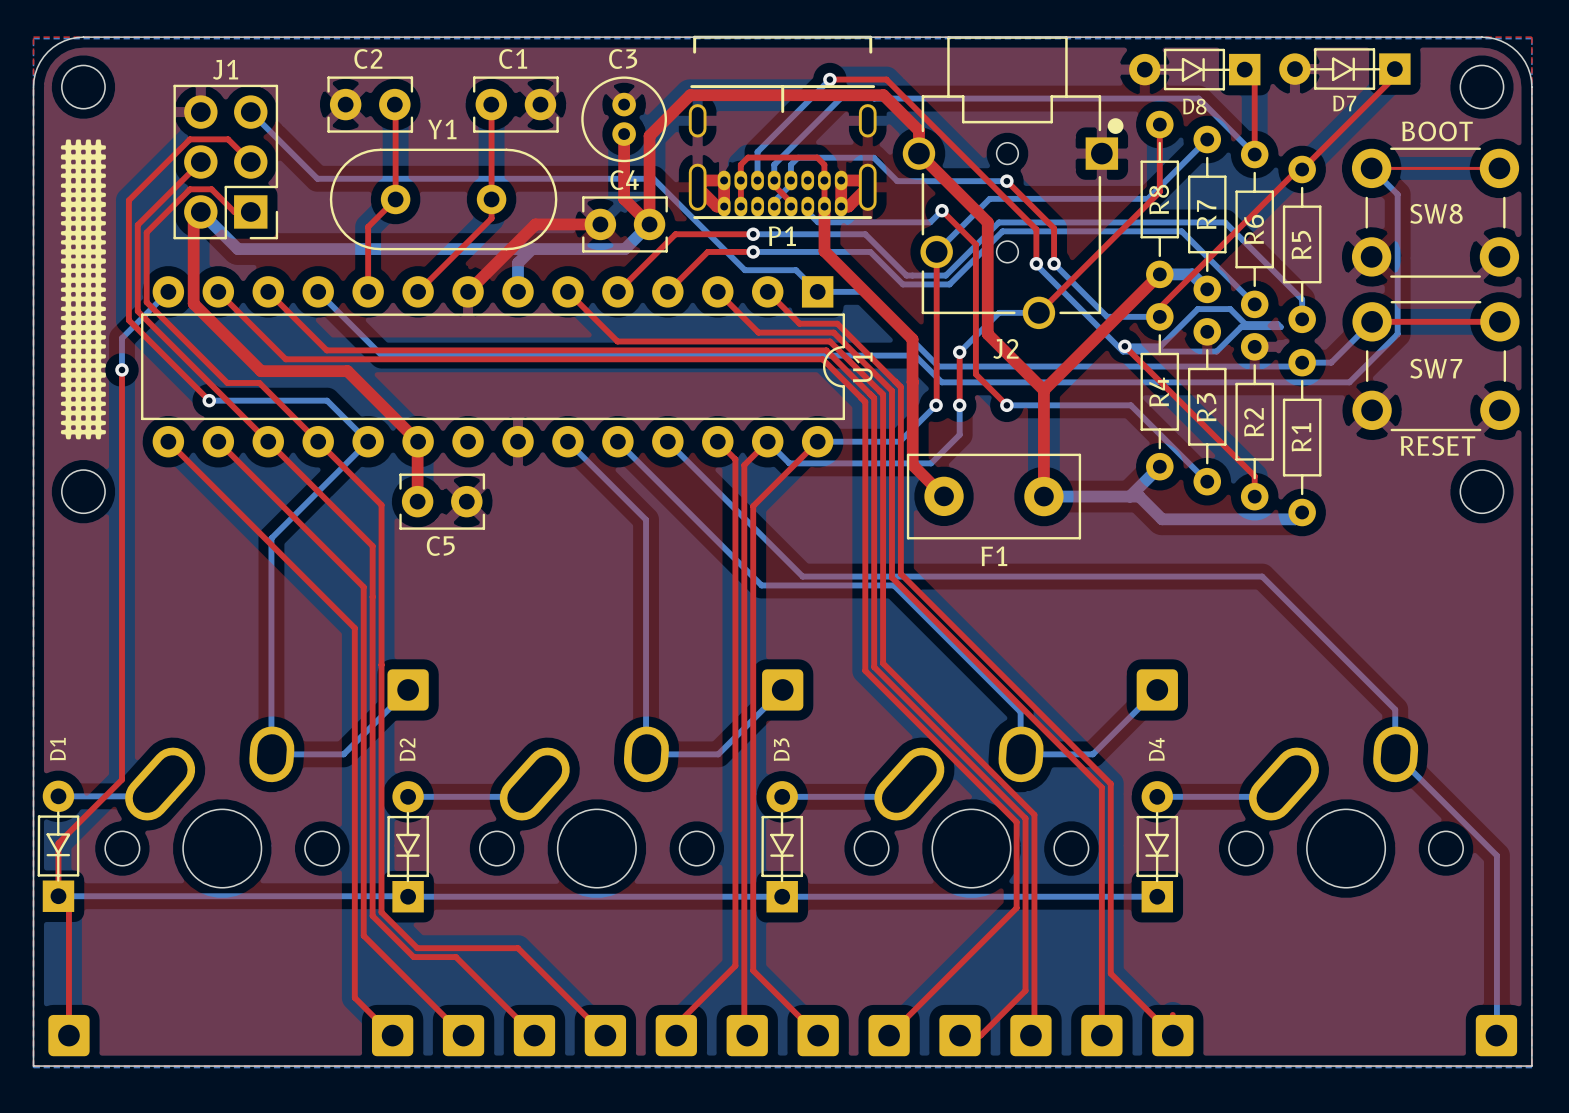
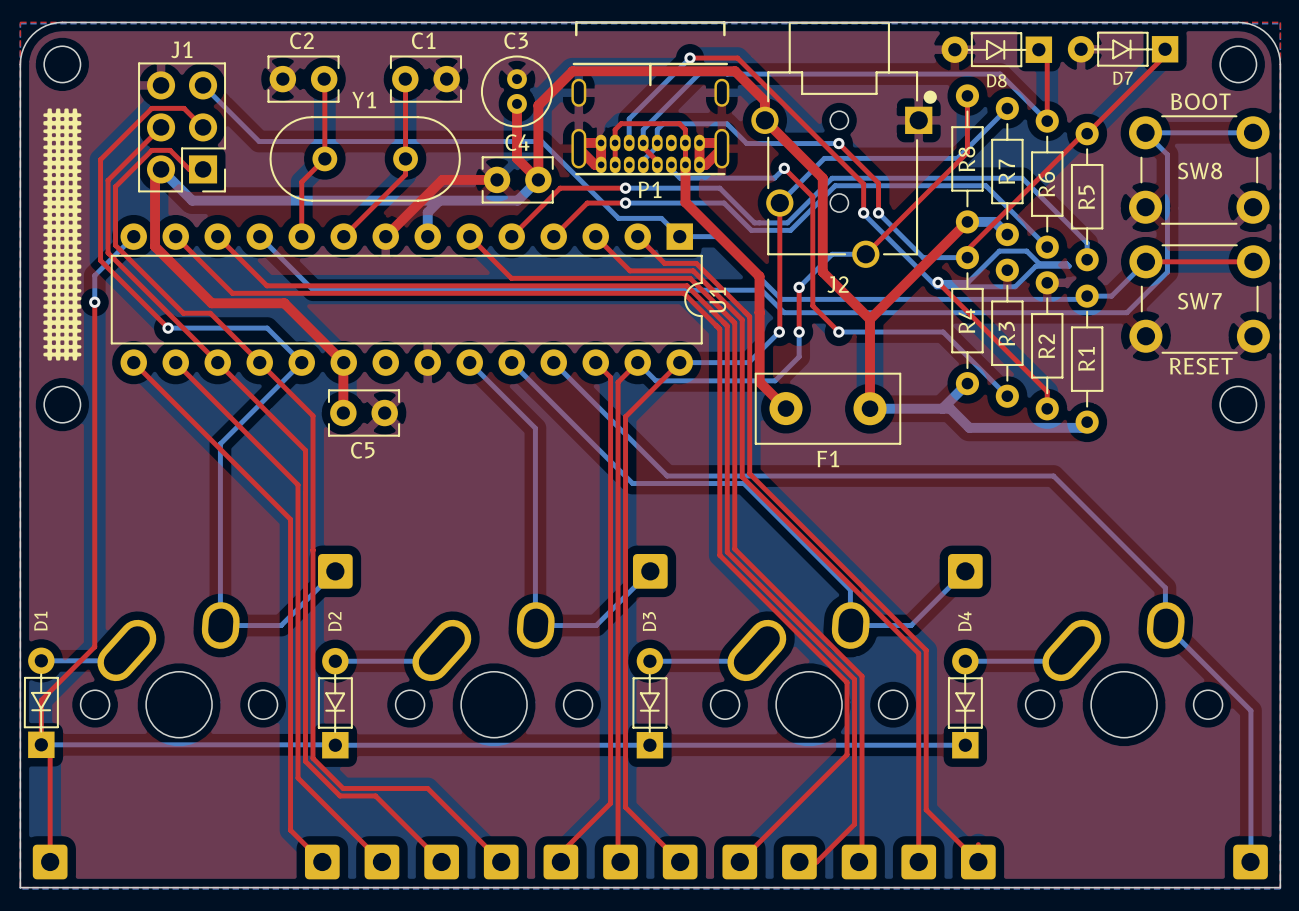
top track: (1371, 168) (1499, 168) -> none
bottom track: none -> (1145, 132) (1253, 132)

